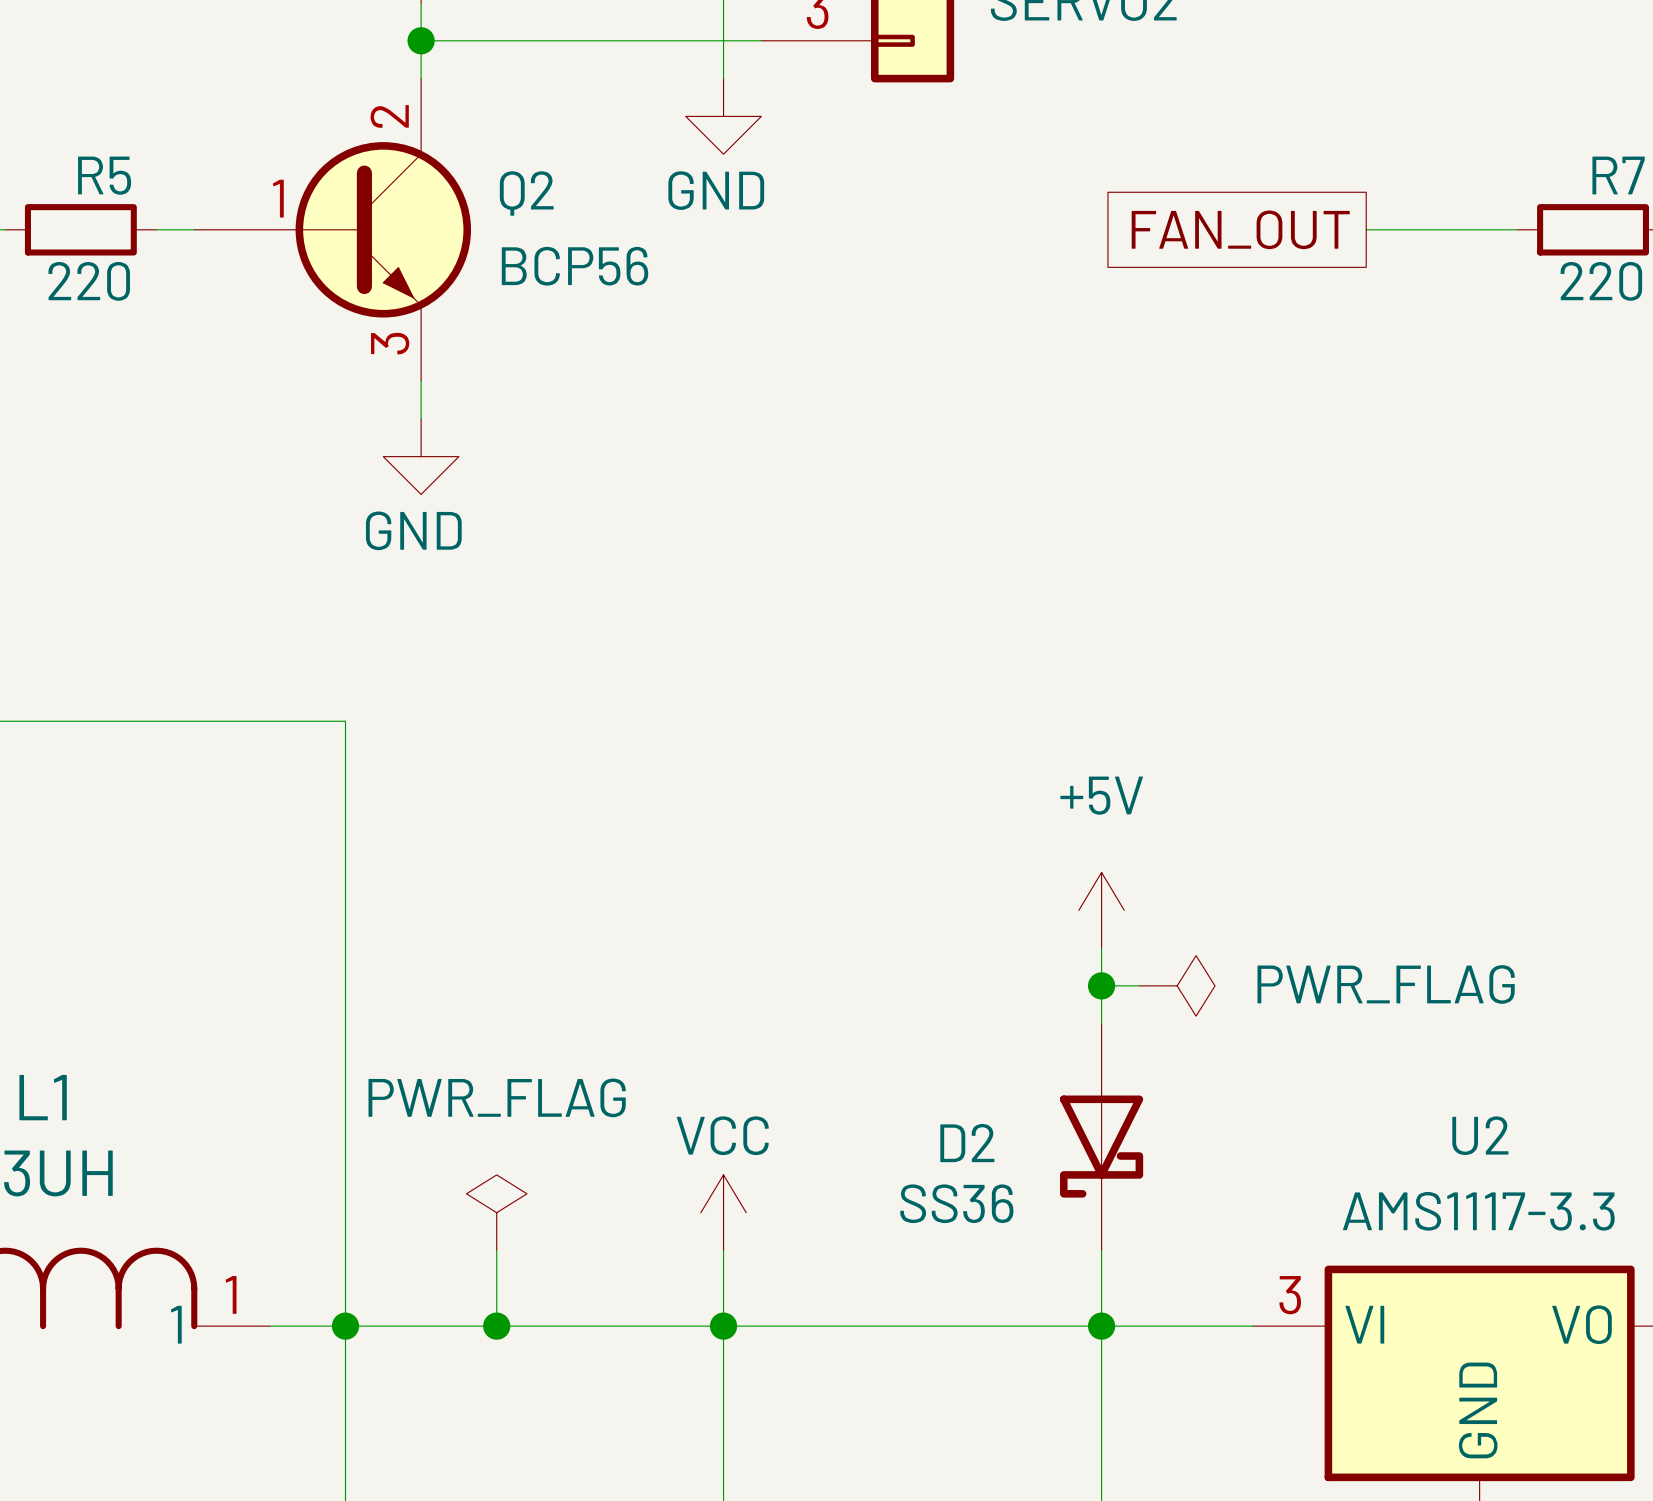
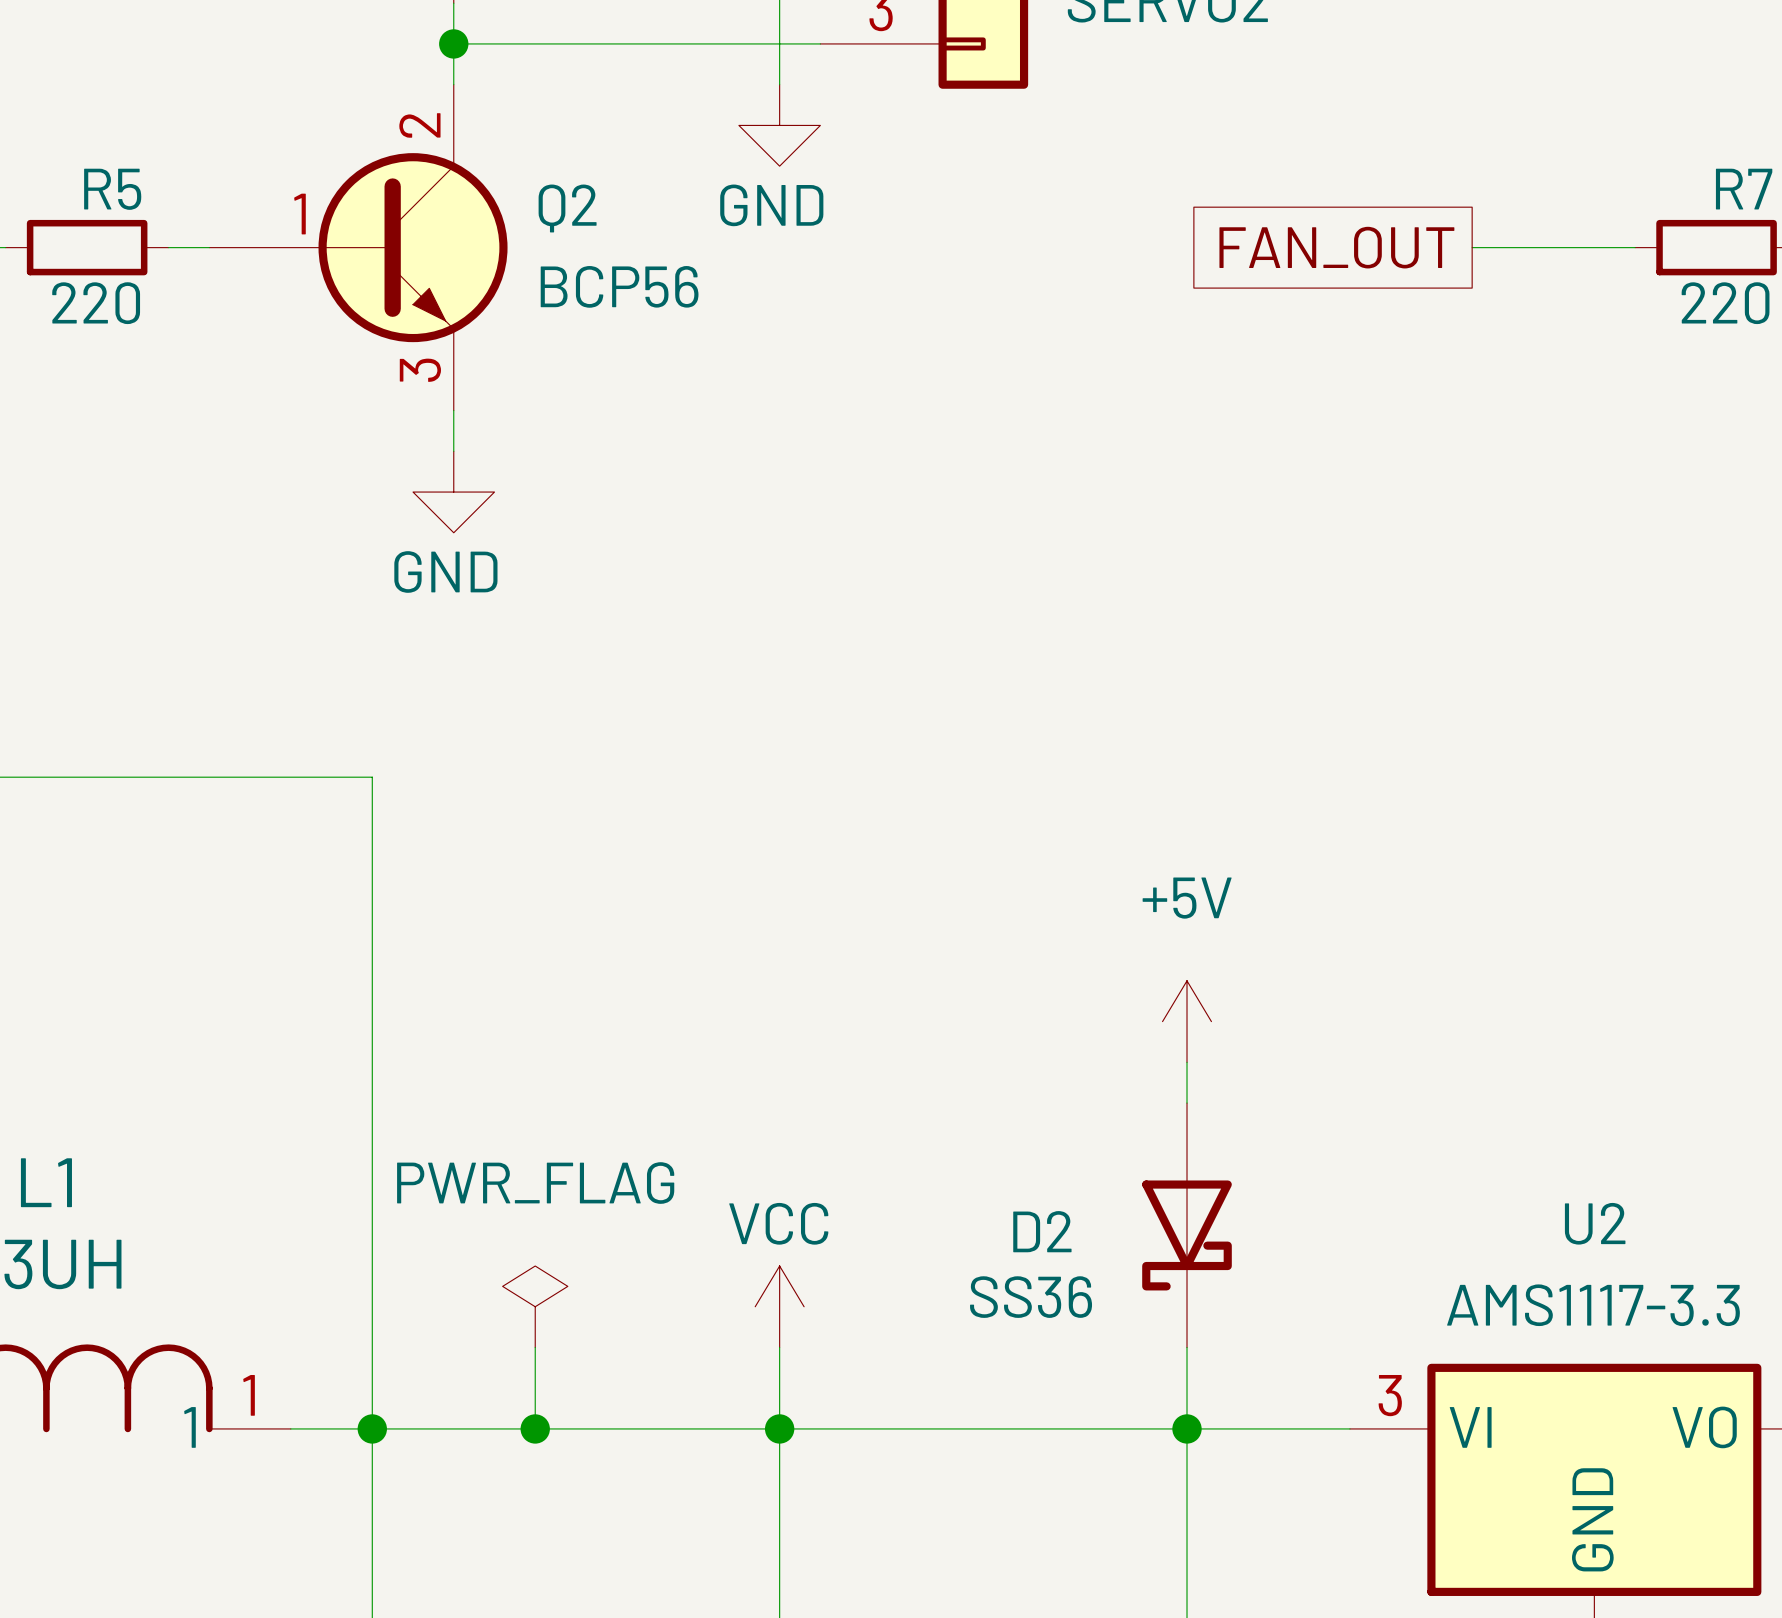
power symbol position: +5V (1101, 910) -> +5V (1187, 1021)
wire: (1101, 948) (1101, 985) (1139, 985) -> none
junction: (1101, 985) -> none
power symbol: PWR_FLAG (1177, 985) -> none

